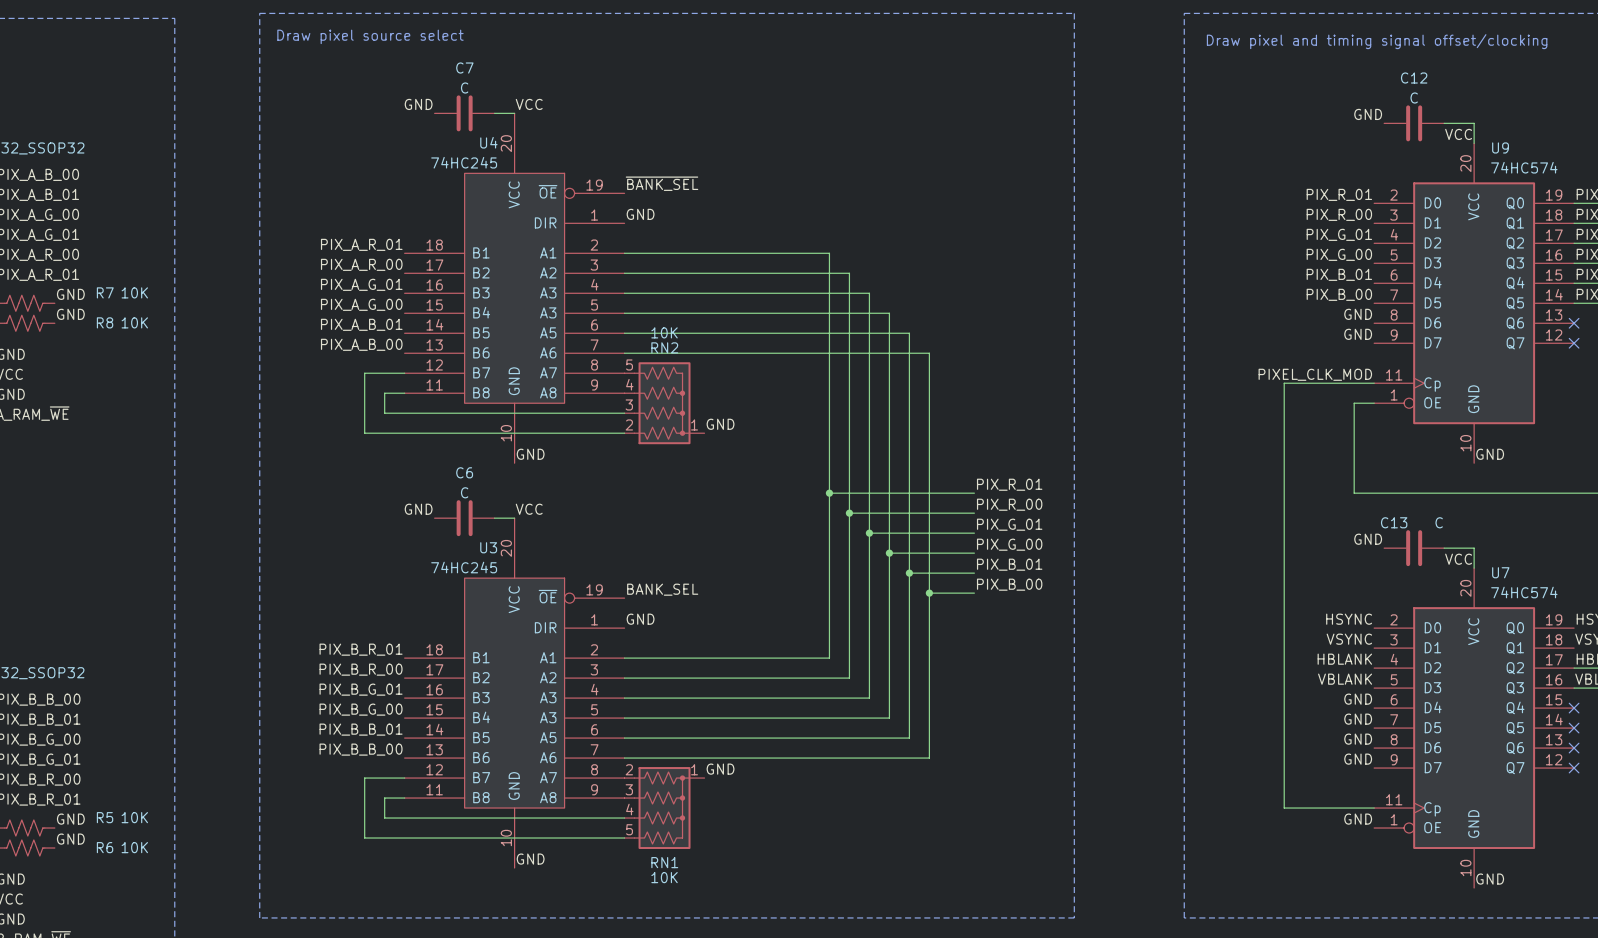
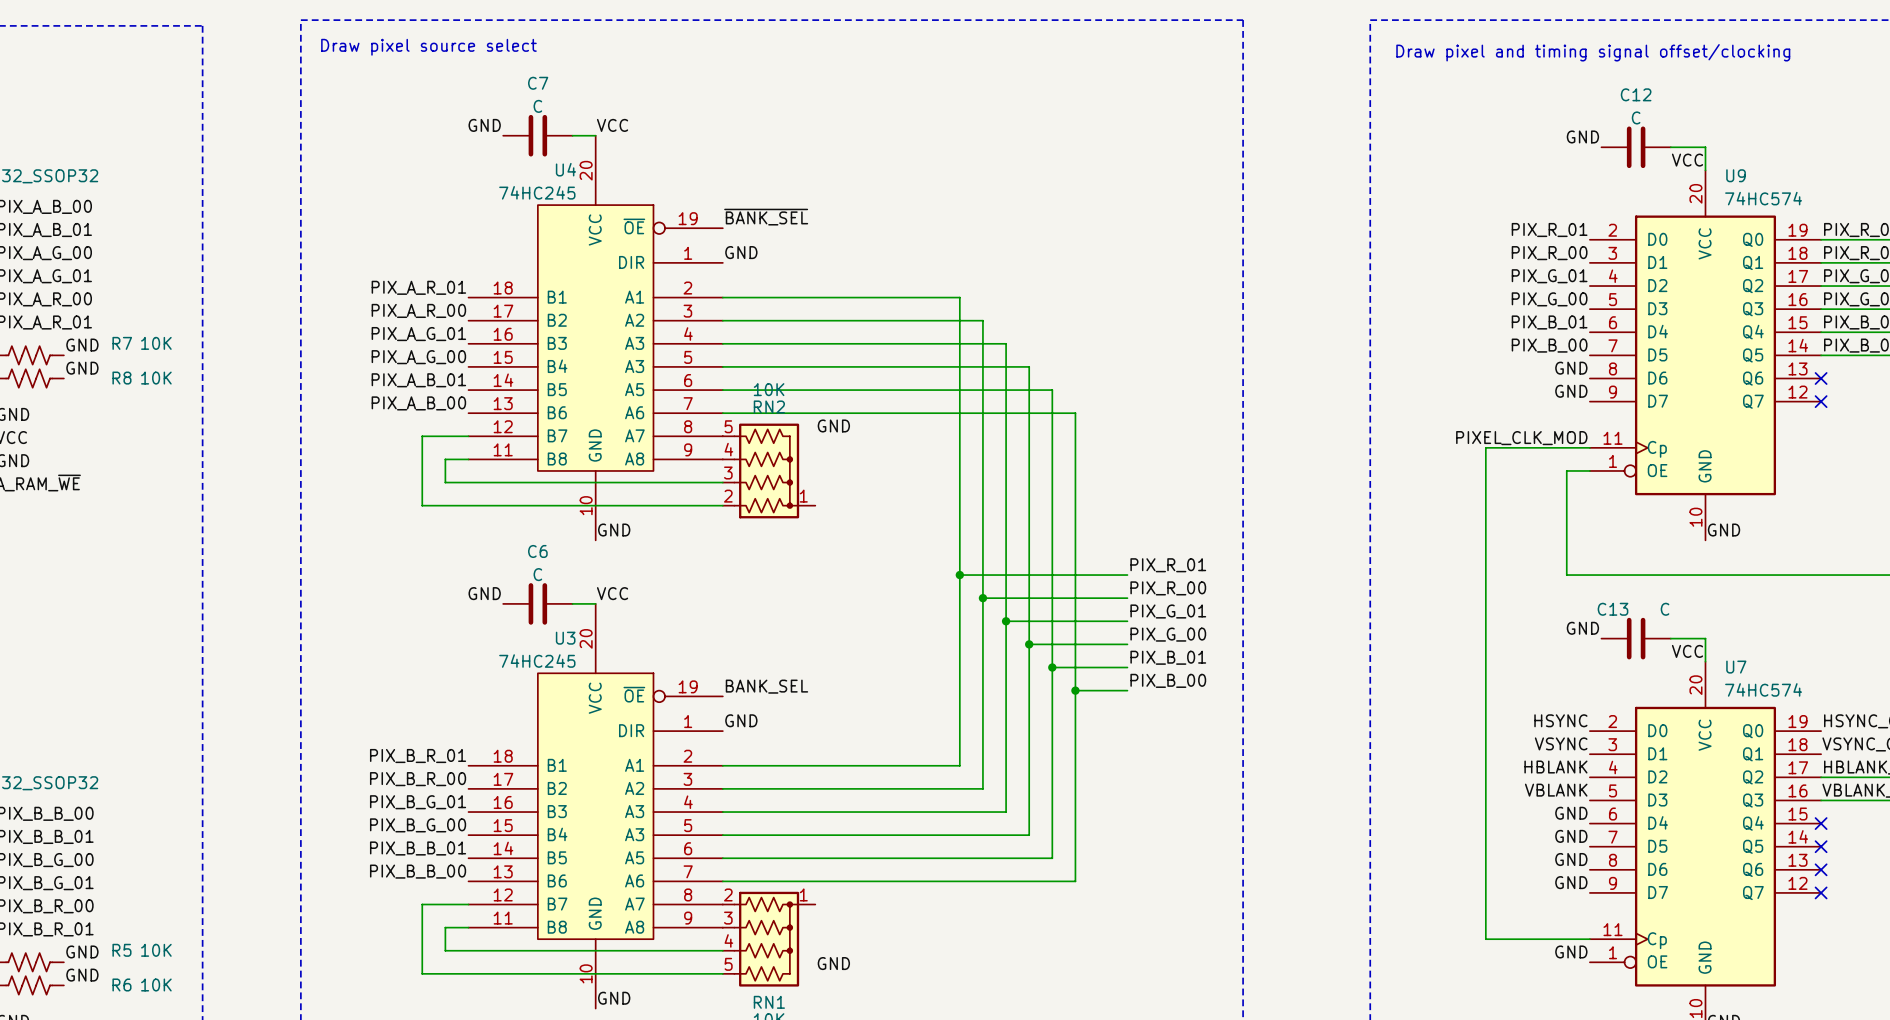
label position: GND (720, 424) -> GND (833, 425)
label position: GND (720, 769) -> GND (833, 963)

